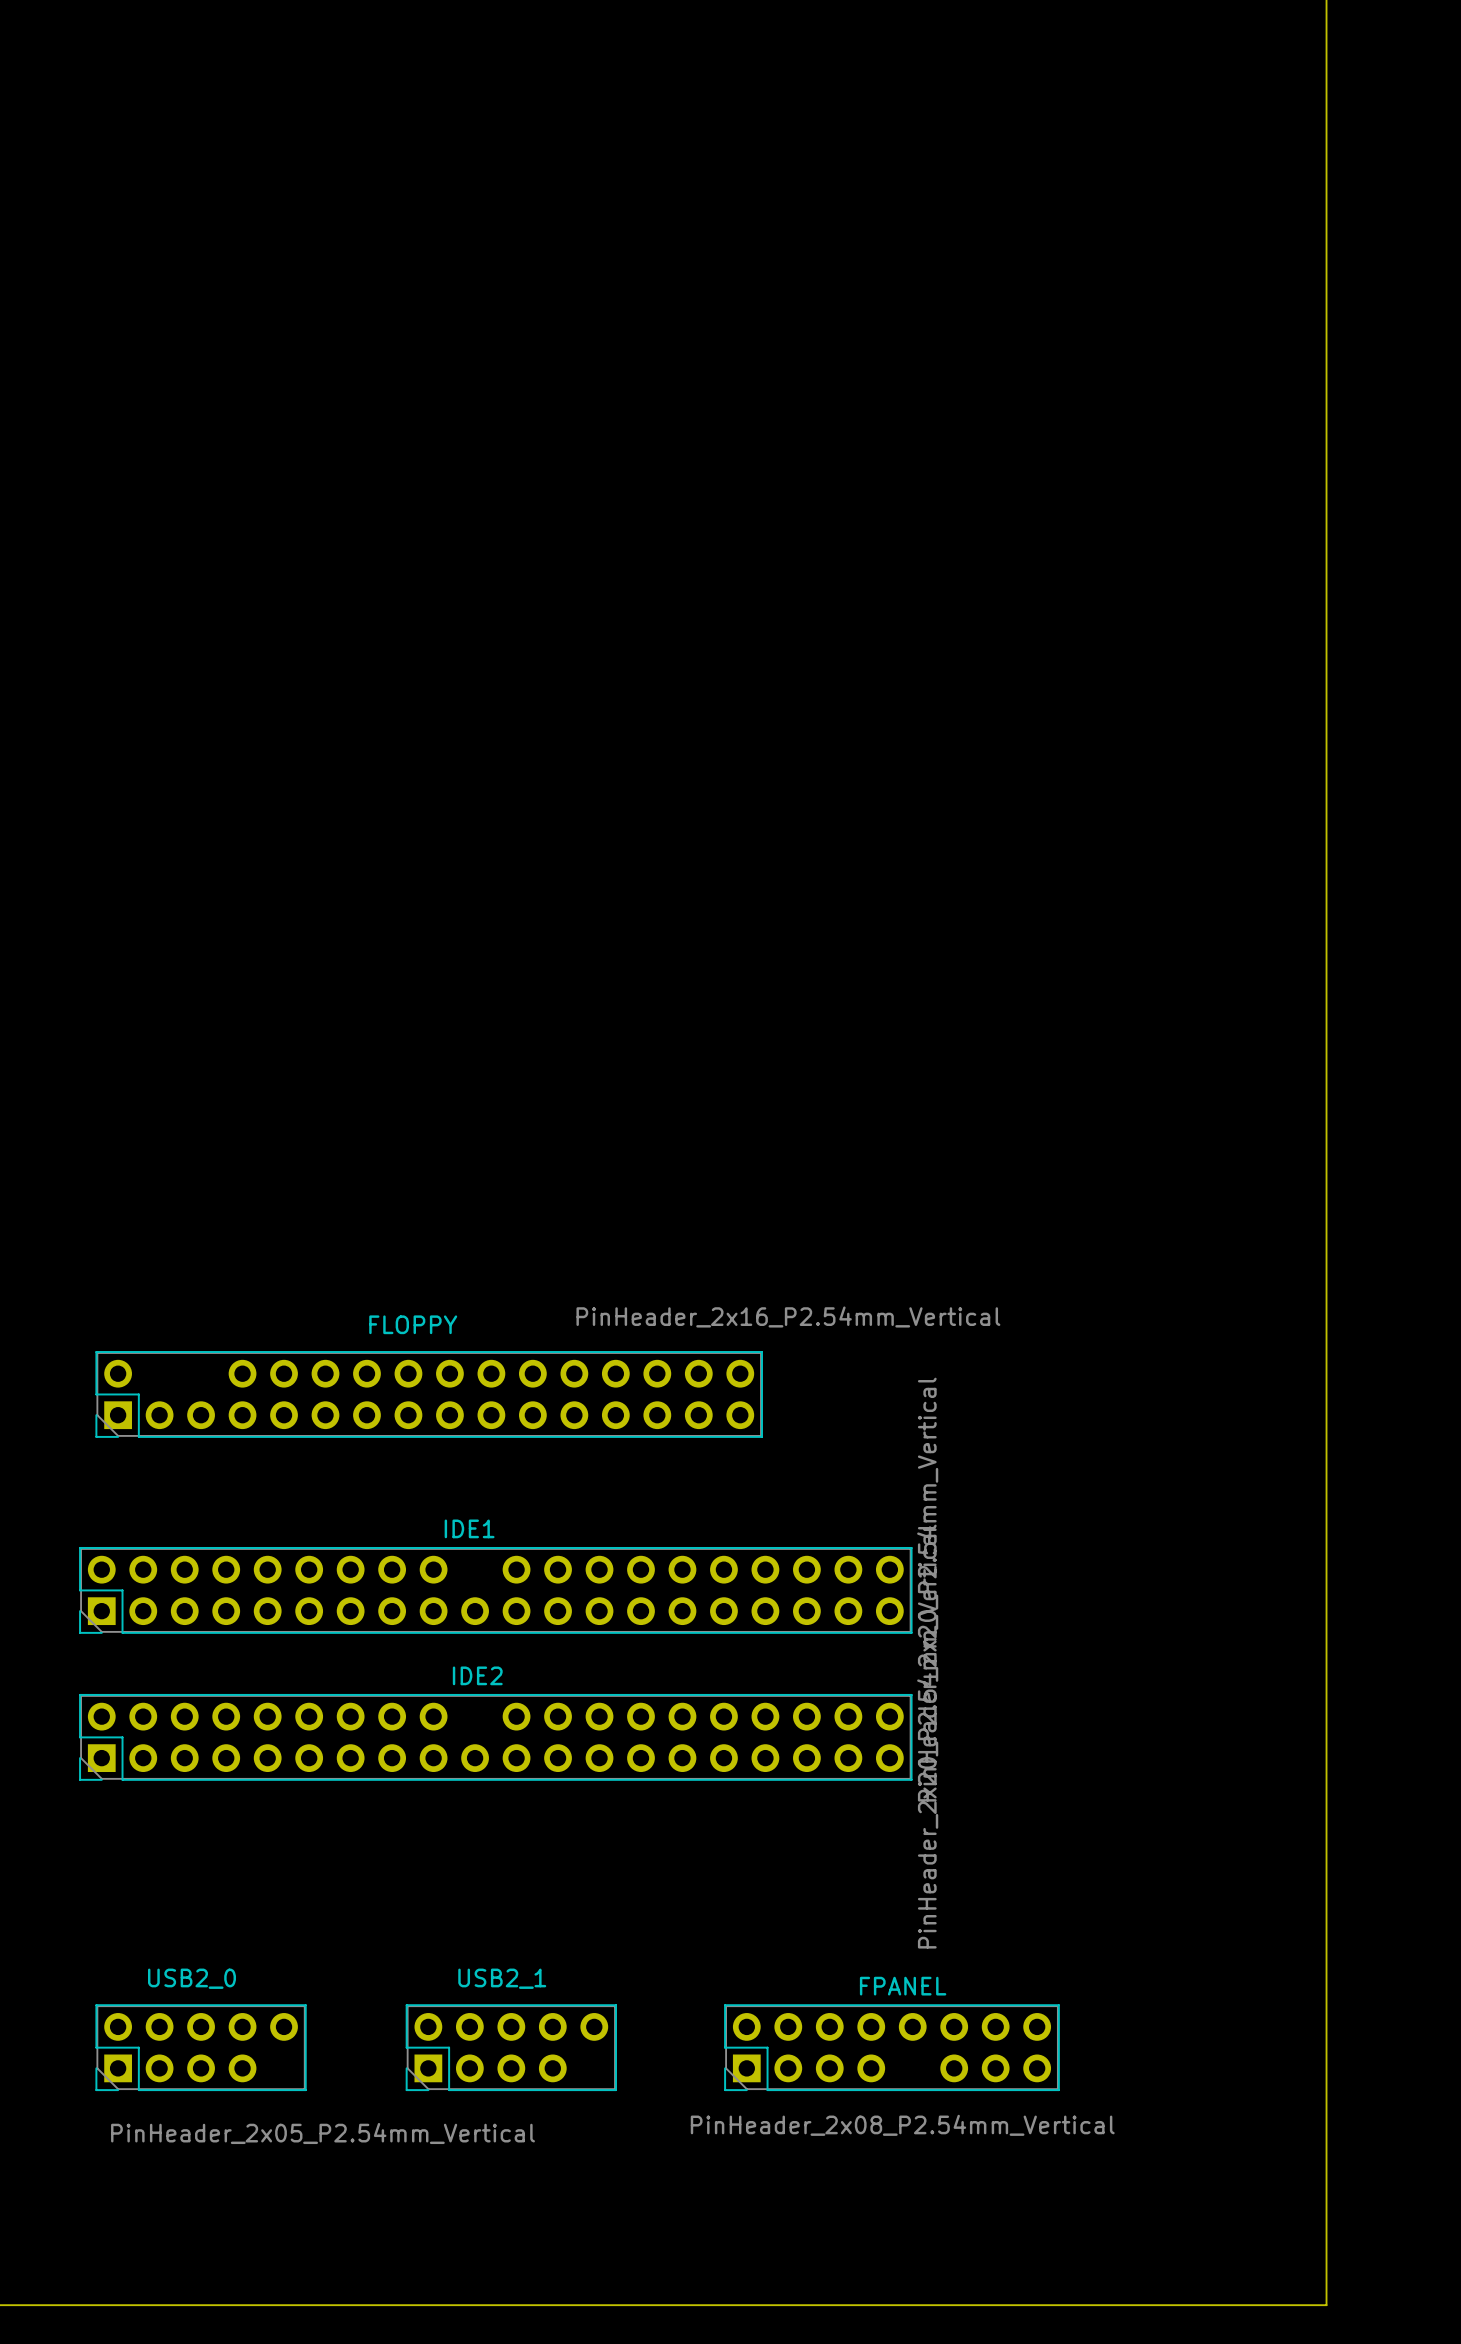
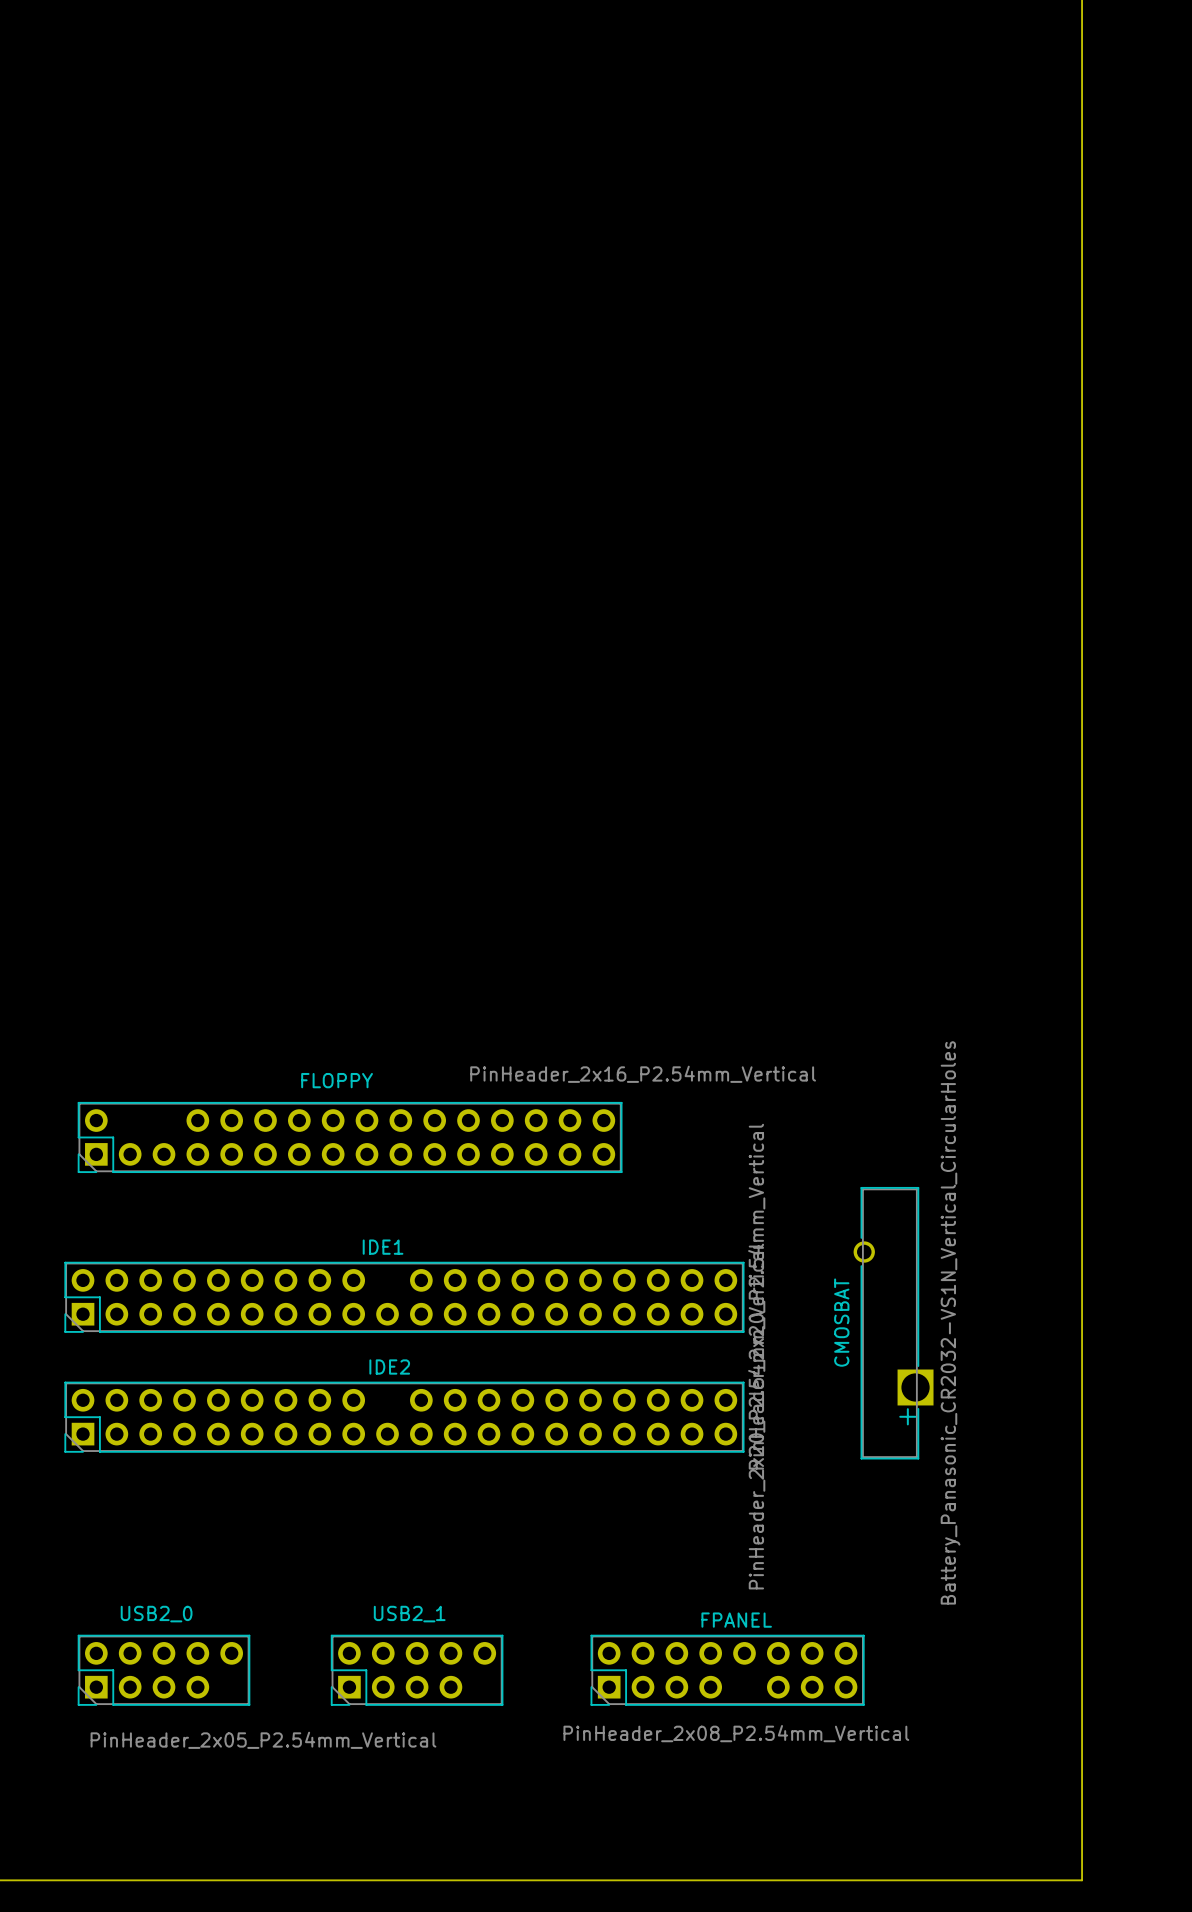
CMOSBAT: none -> Battery_Panasonic_CR2032-VS1N_Vertical_CircularHoles (893, 1323)

